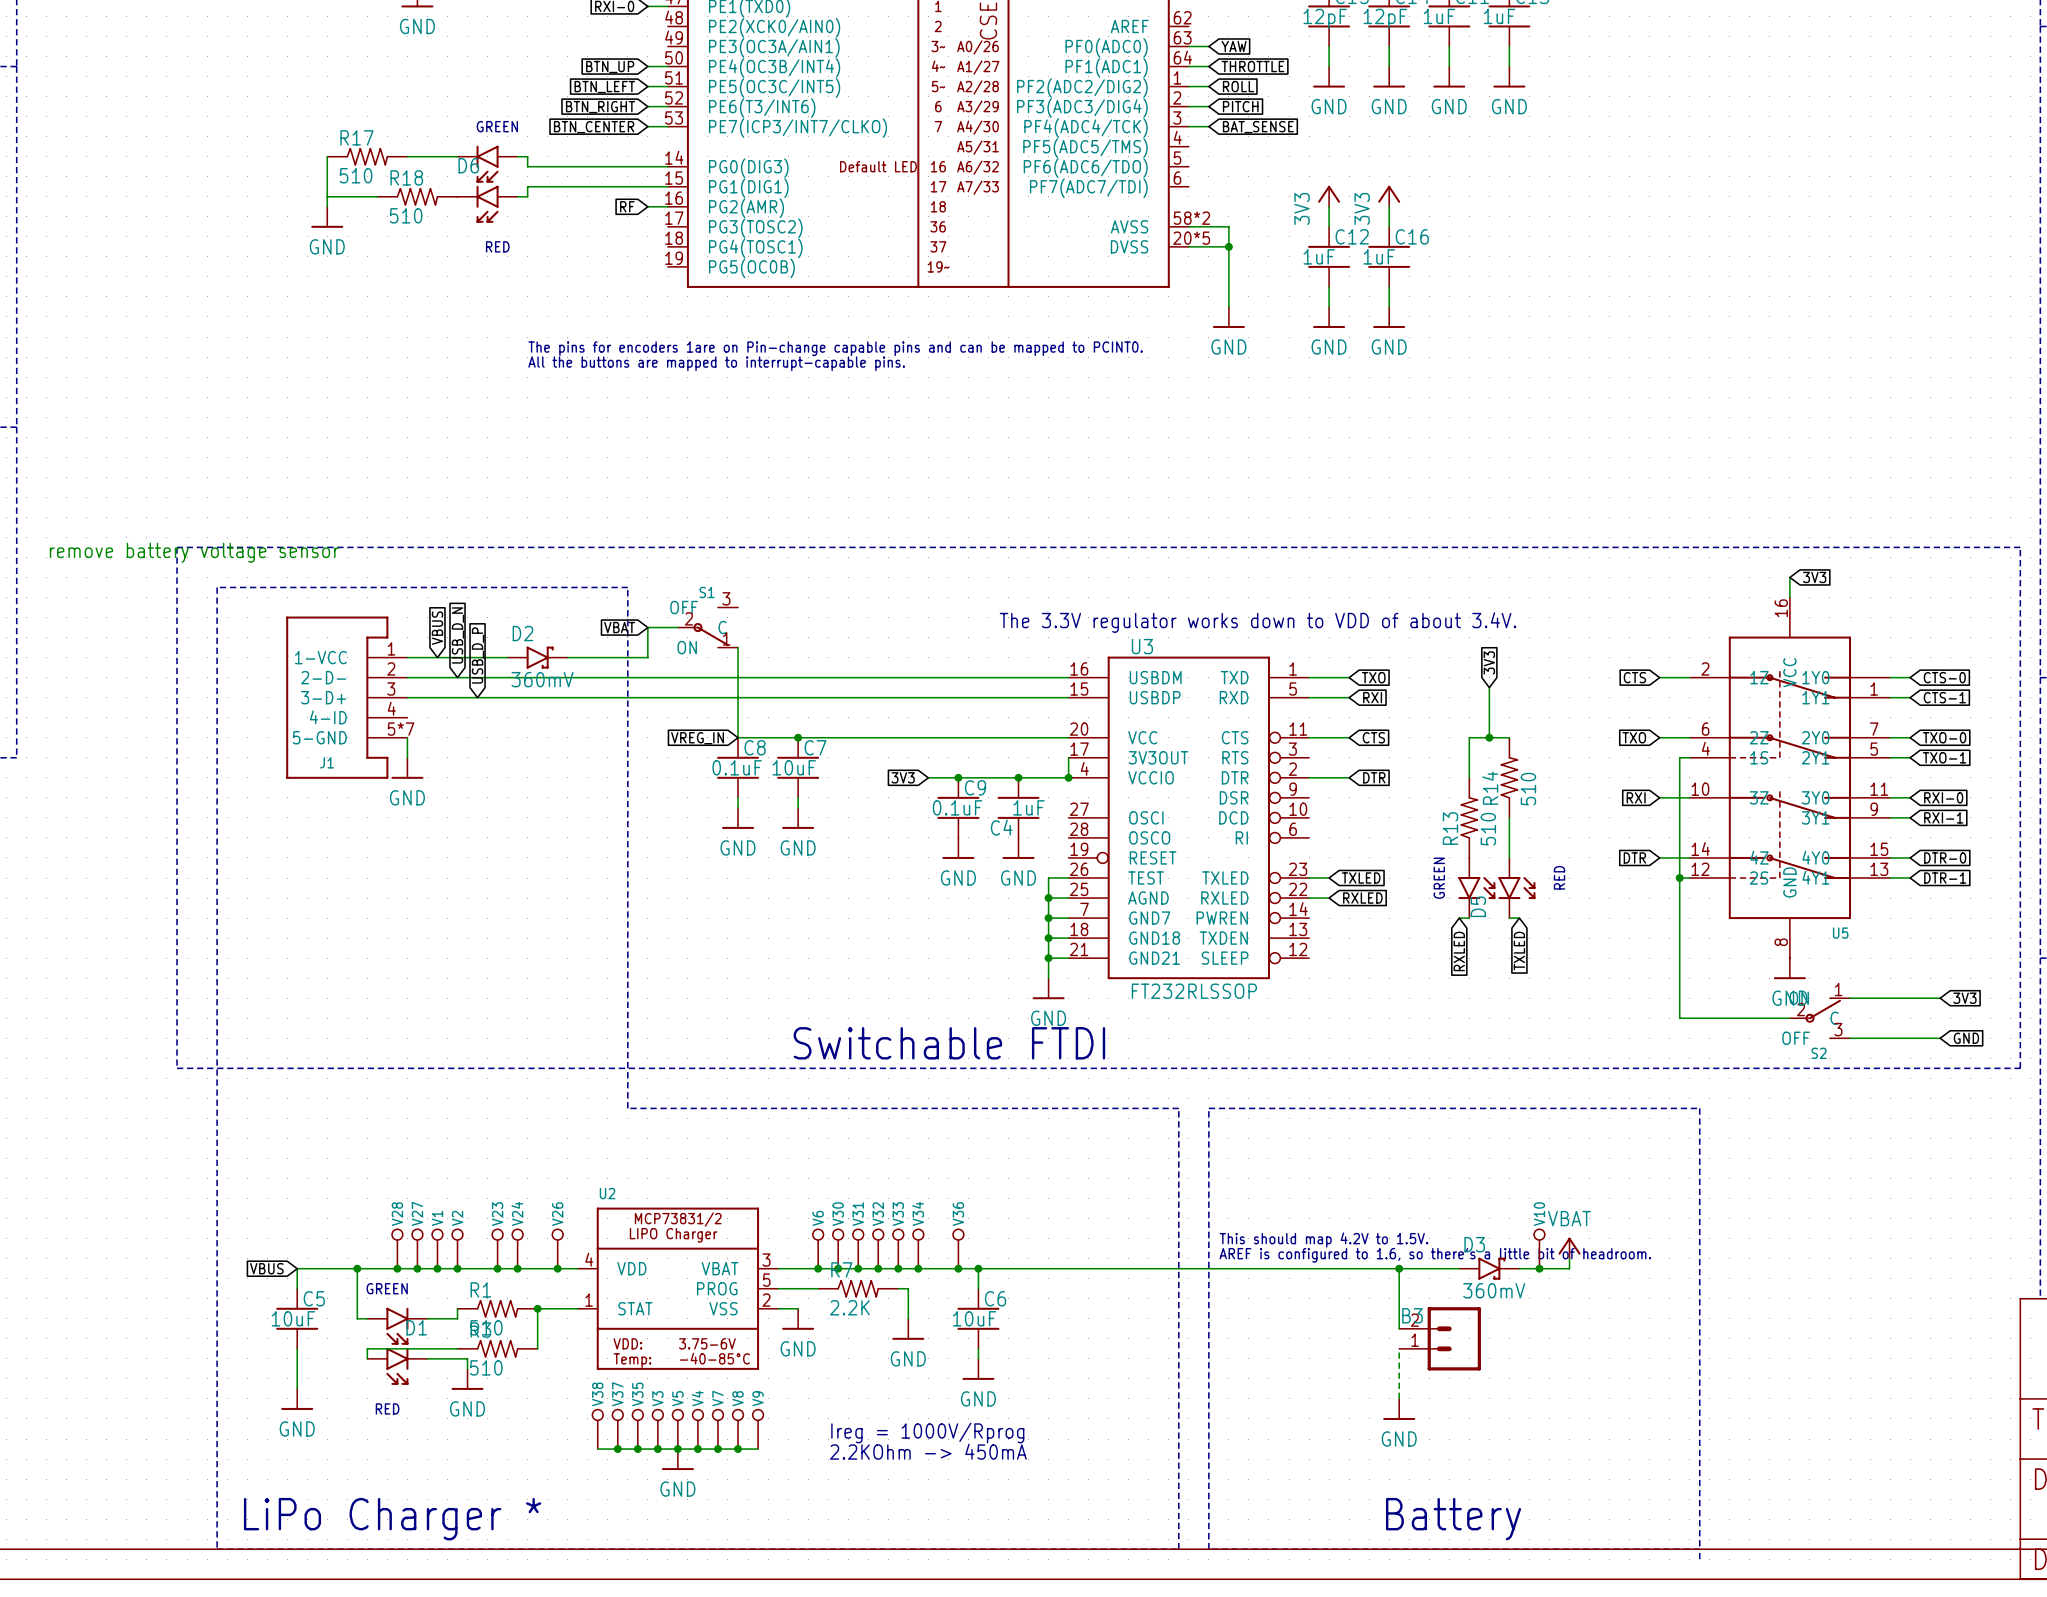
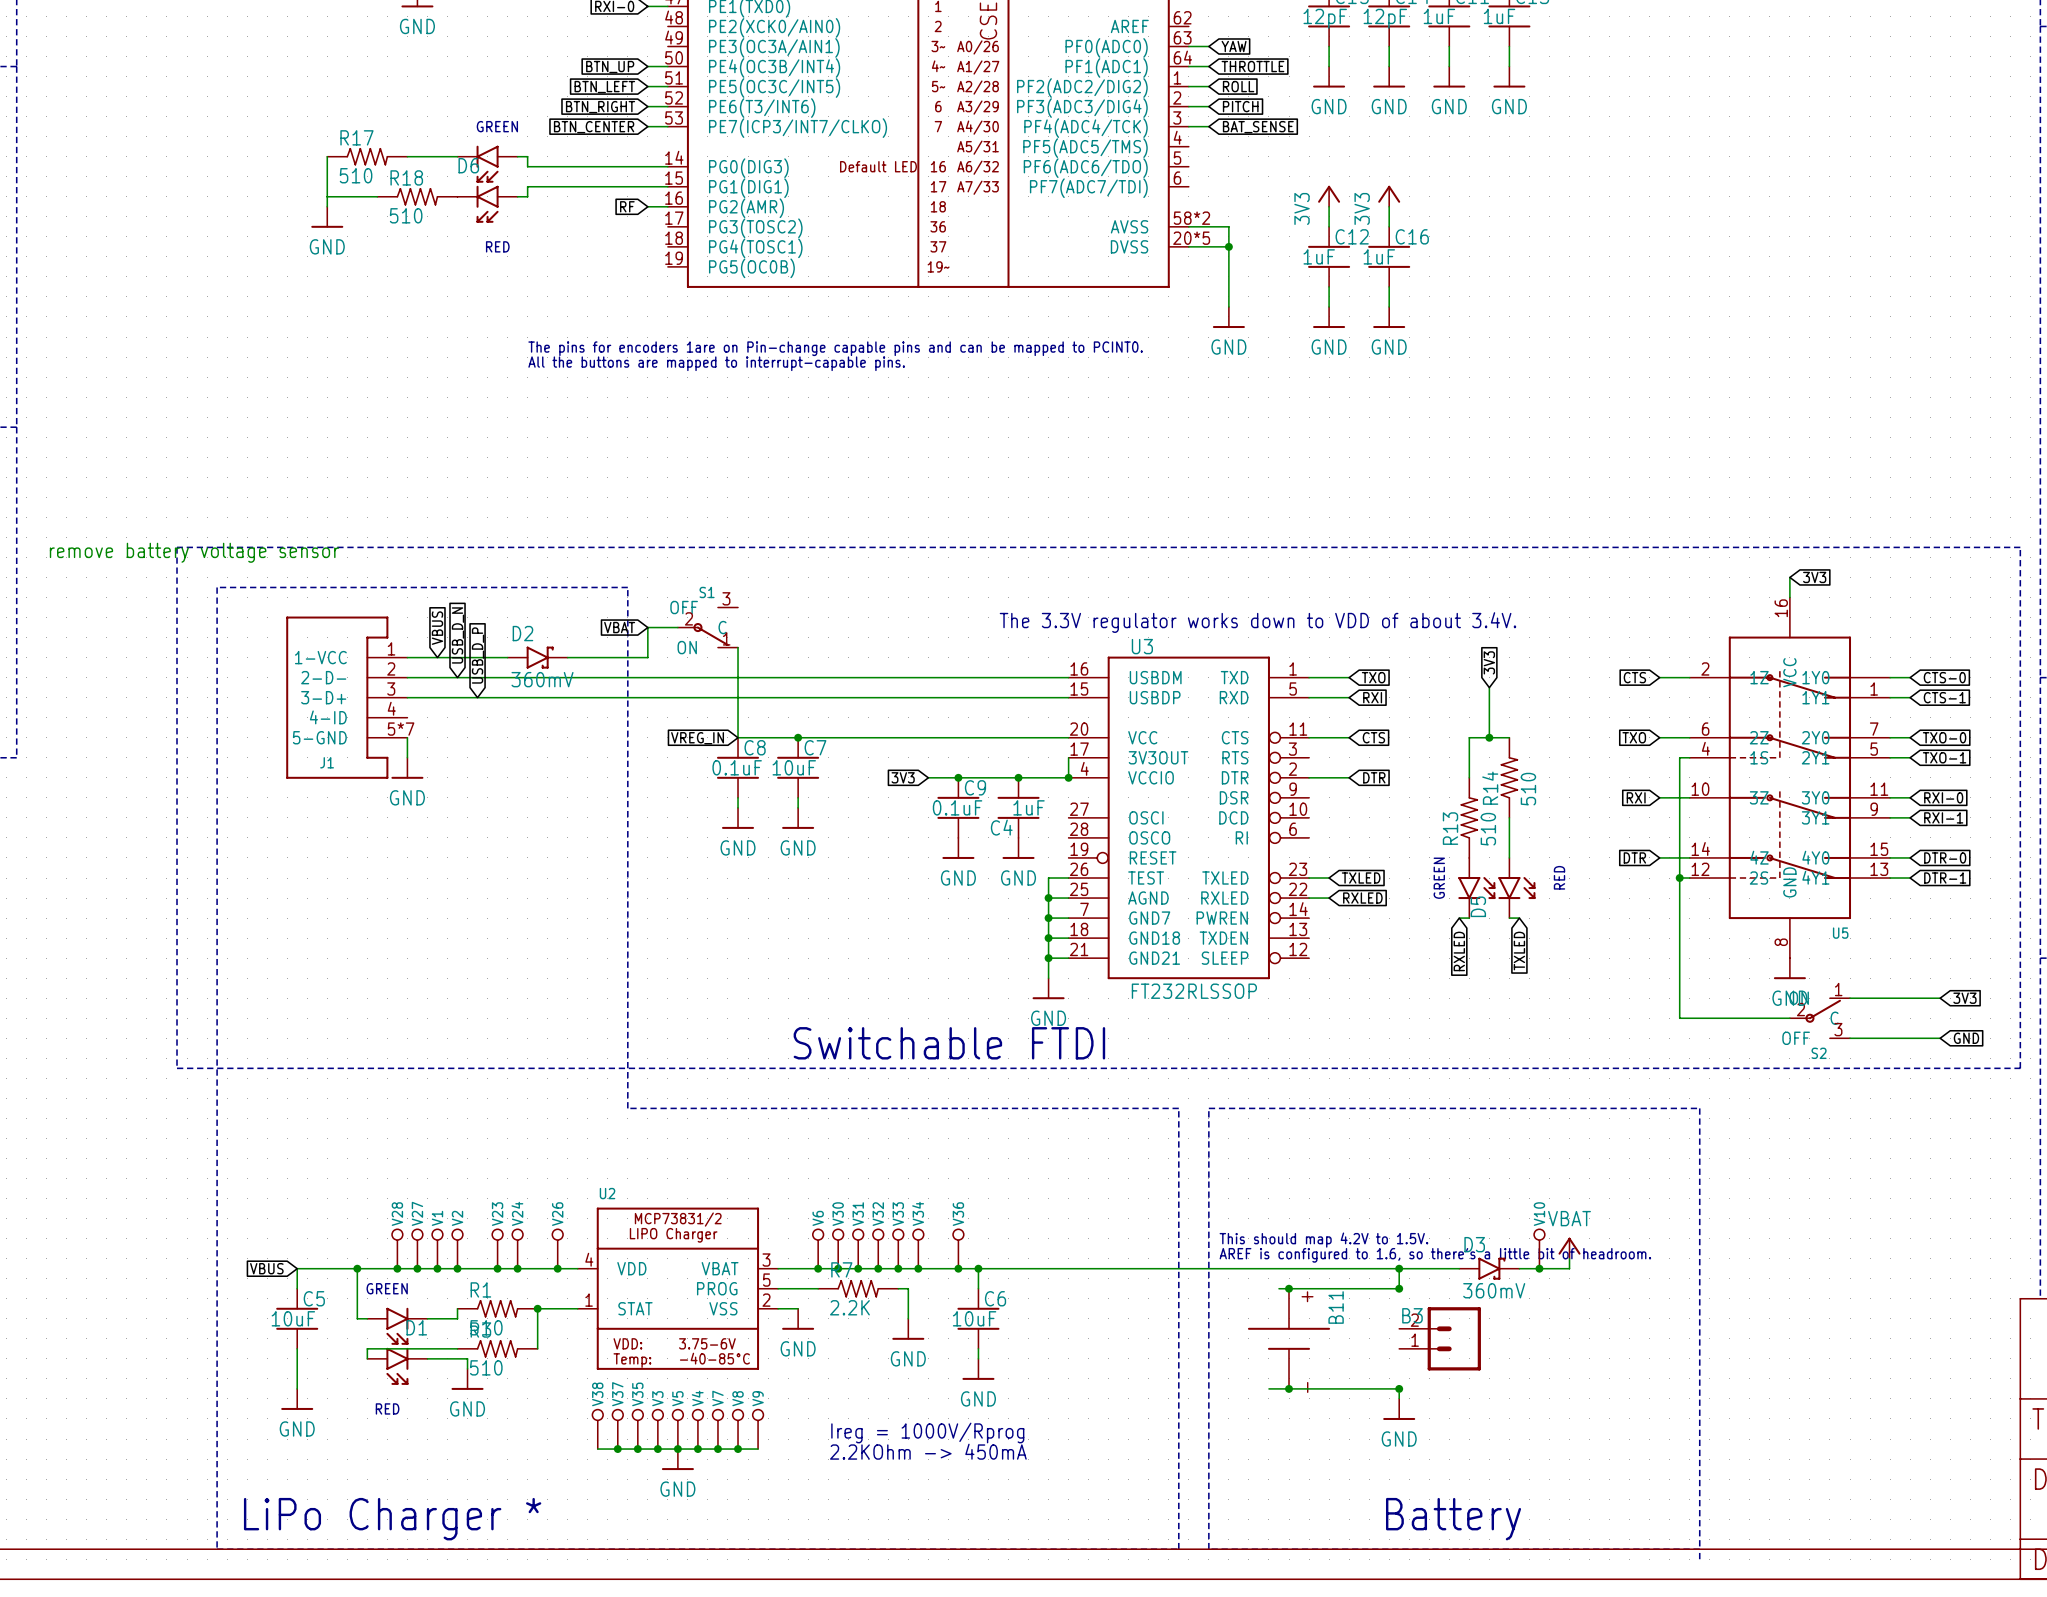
junction: none -> (1289, 1288)
wire: (1399, 1288) (1399, 1328) -> (1399, 1288) (1278, 1288)
junction: none -> (1399, 1288)
B11: none -> (1289, 1338)
wire: (1399, 1348) (1399, 1388) -> (1268, 1388) (1399, 1388)
junction: none -> (1289, 1388)
junction: none -> (1399, 1388)

